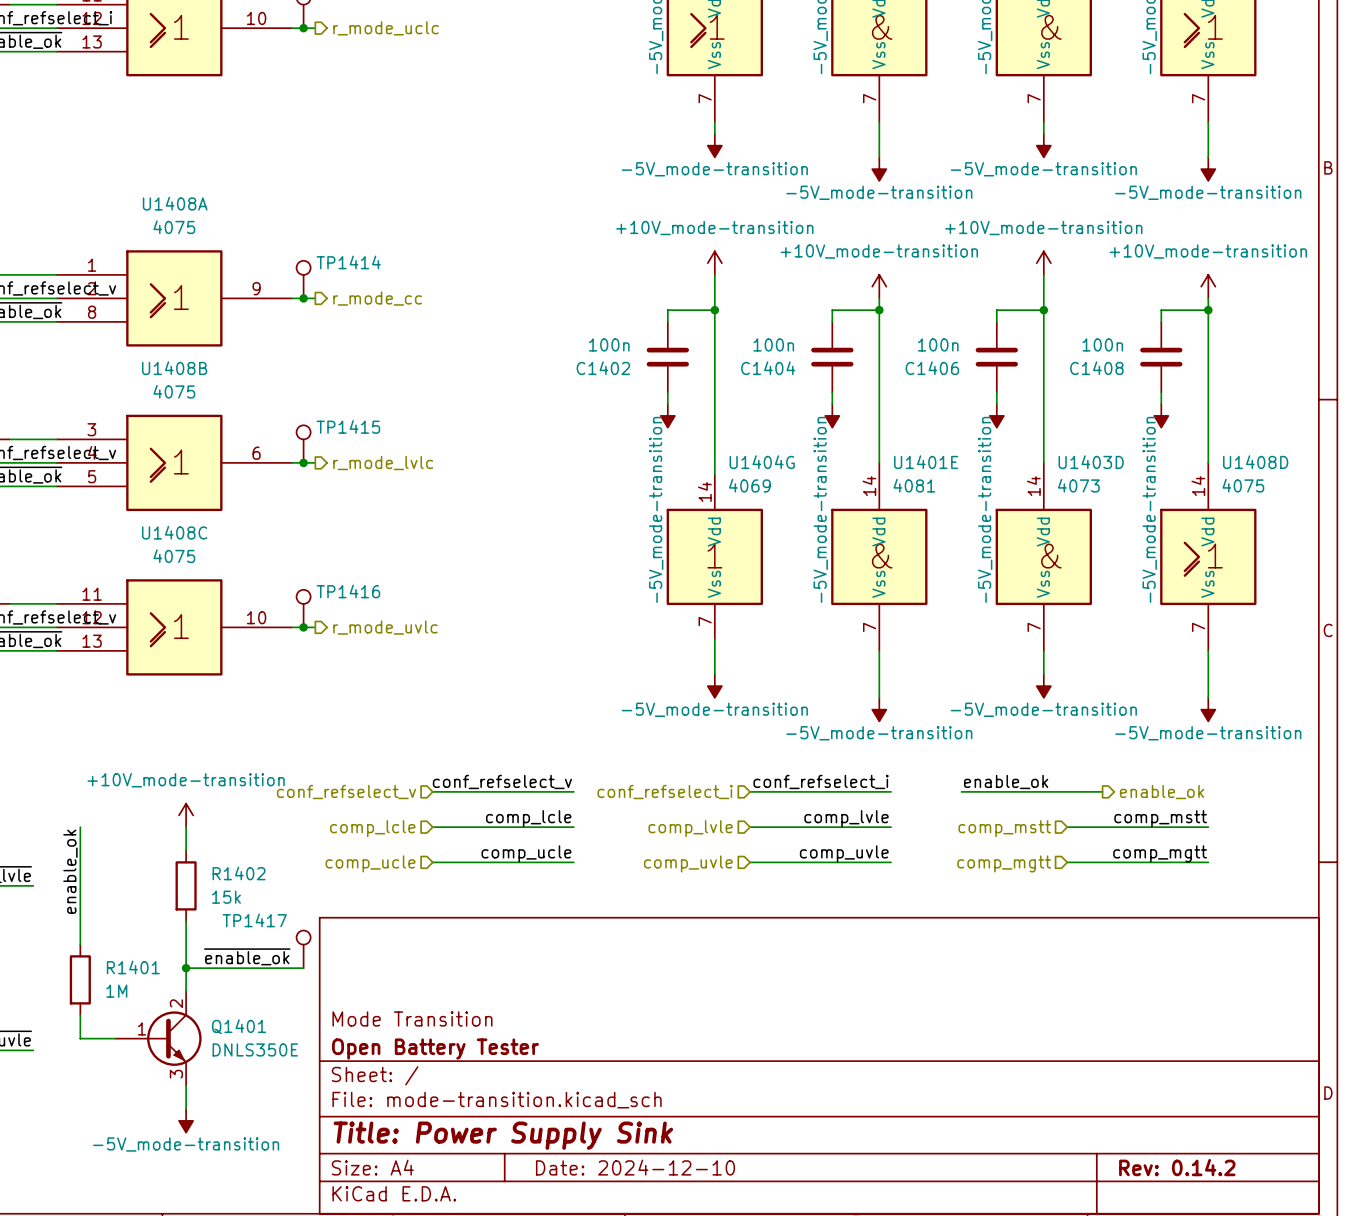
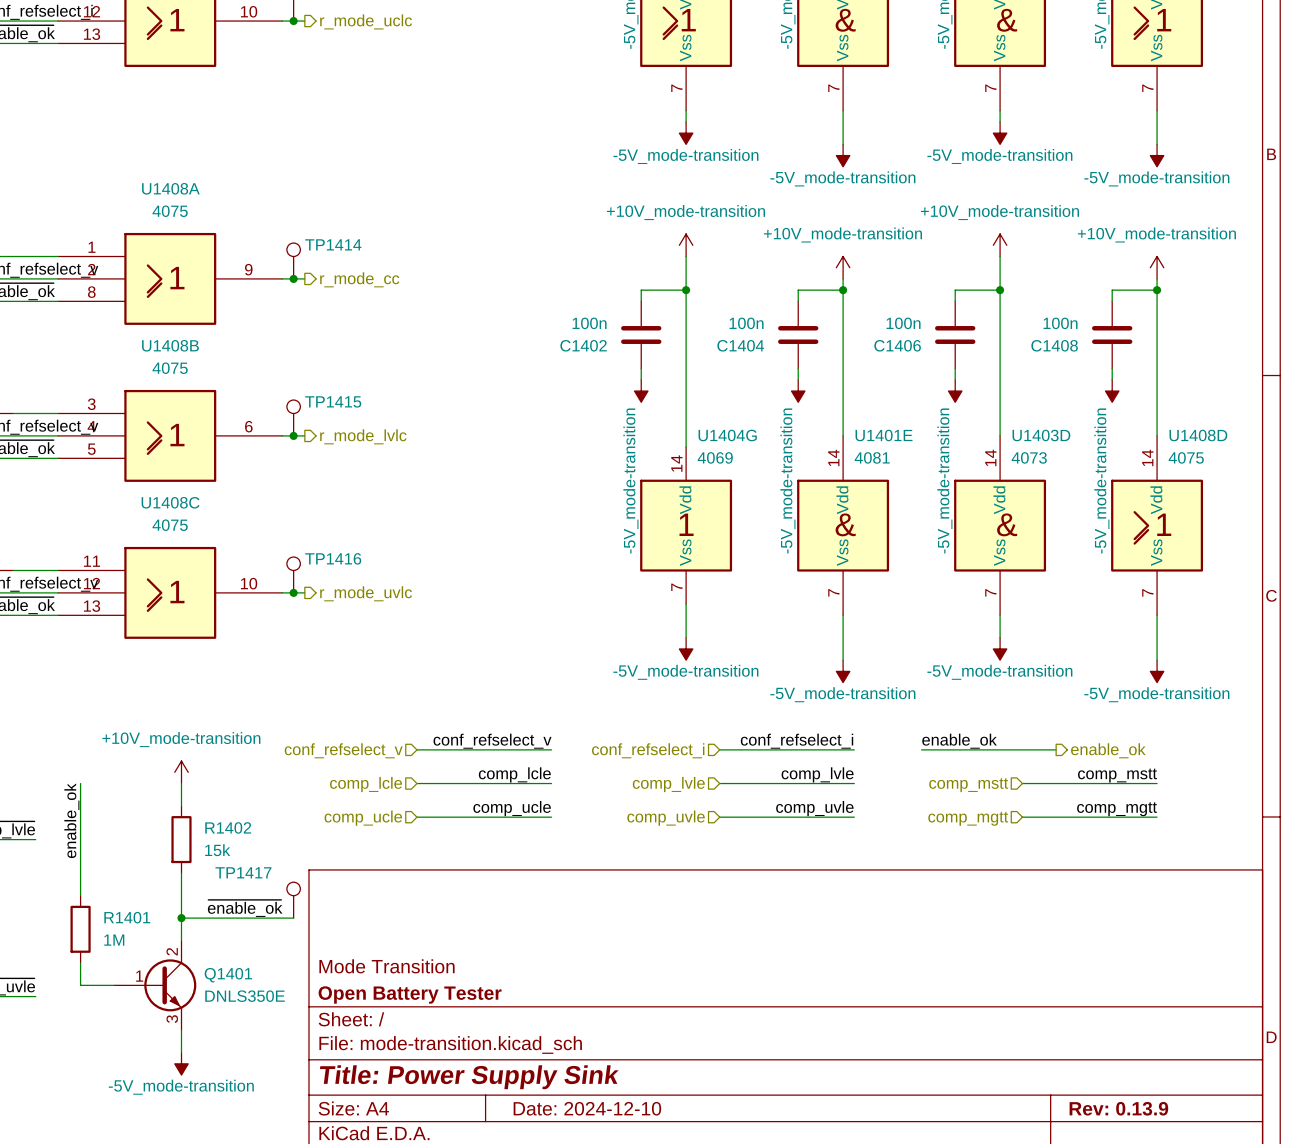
title block: Rev: 0.14.2 (1177, 1167) -> Rev: 0.13.9 (1118, 1108)

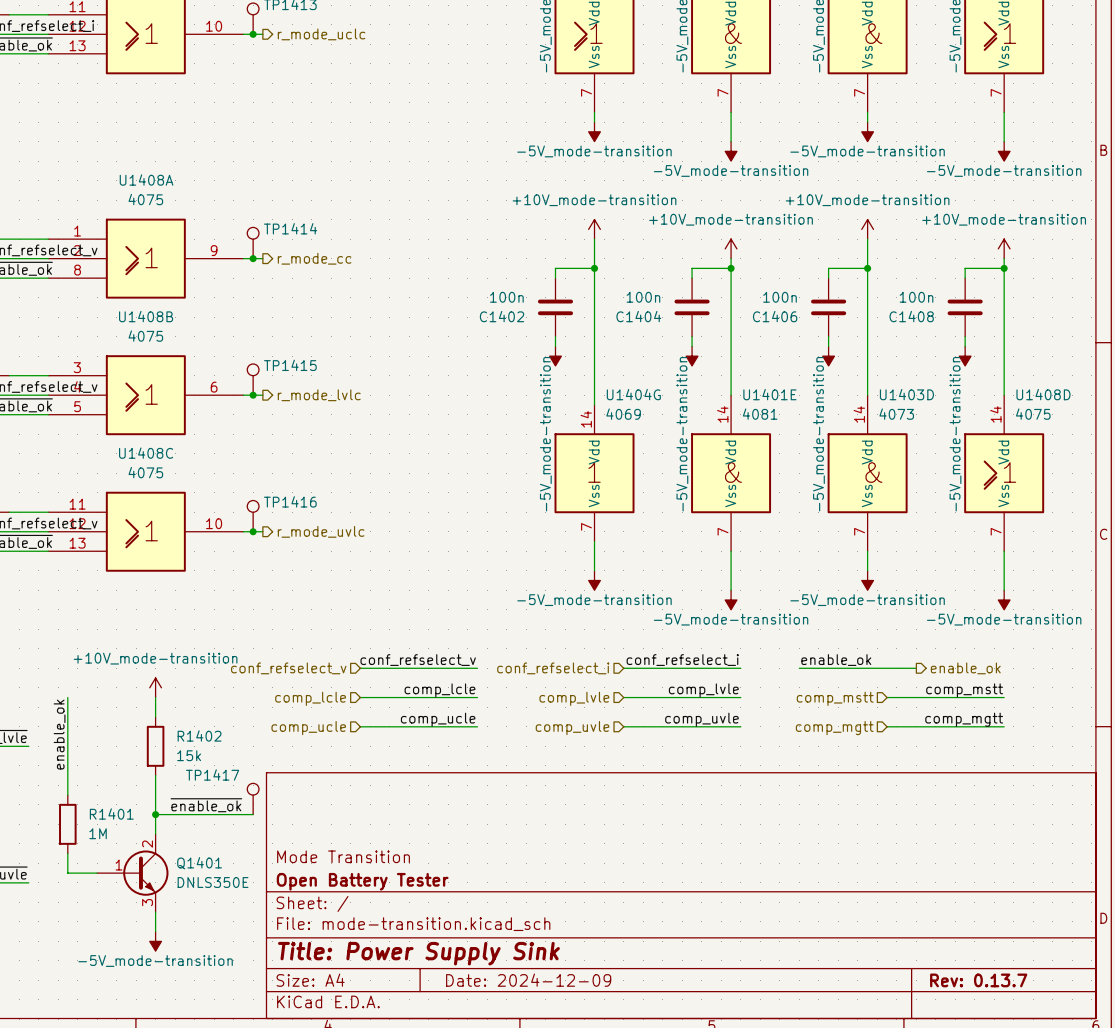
title block: Date: 2024-12-10 (587, 1108) -> Date: 2024-12-09 (528, 980)
title block: Rev: 0.13.9 (1118, 1108) -> Rev: 0.13.7 (978, 980)

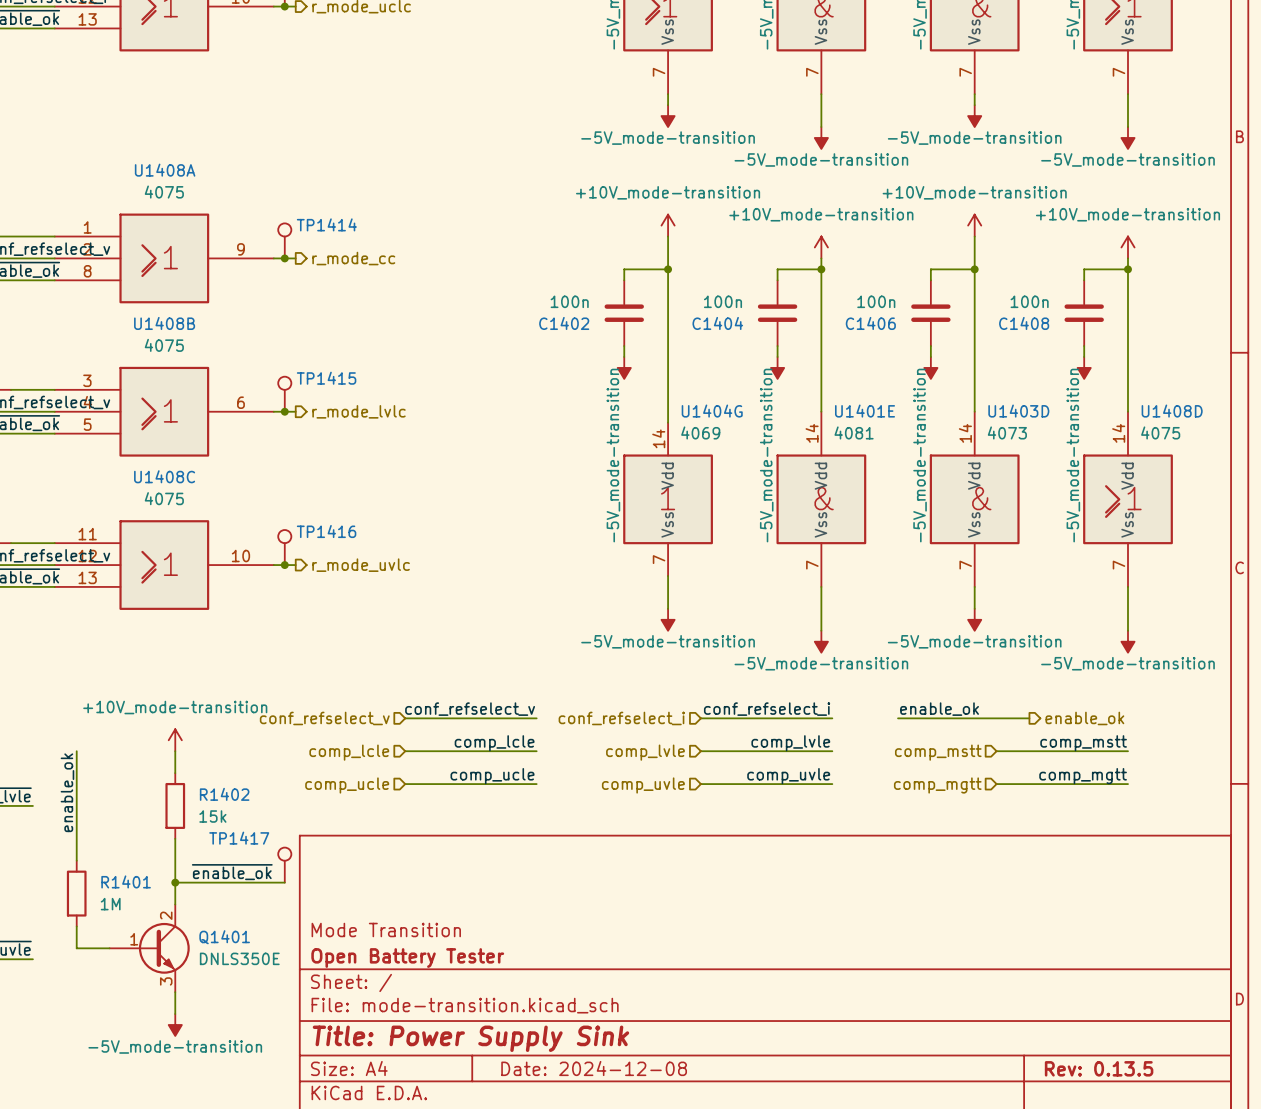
title block: Date: 2024-12-09 (528, 980) -> Date: 2024-12-08 (594, 1068)
title block: Rev: 0.13.7 (978, 980) -> Rev: 0.13.5 (1099, 1068)

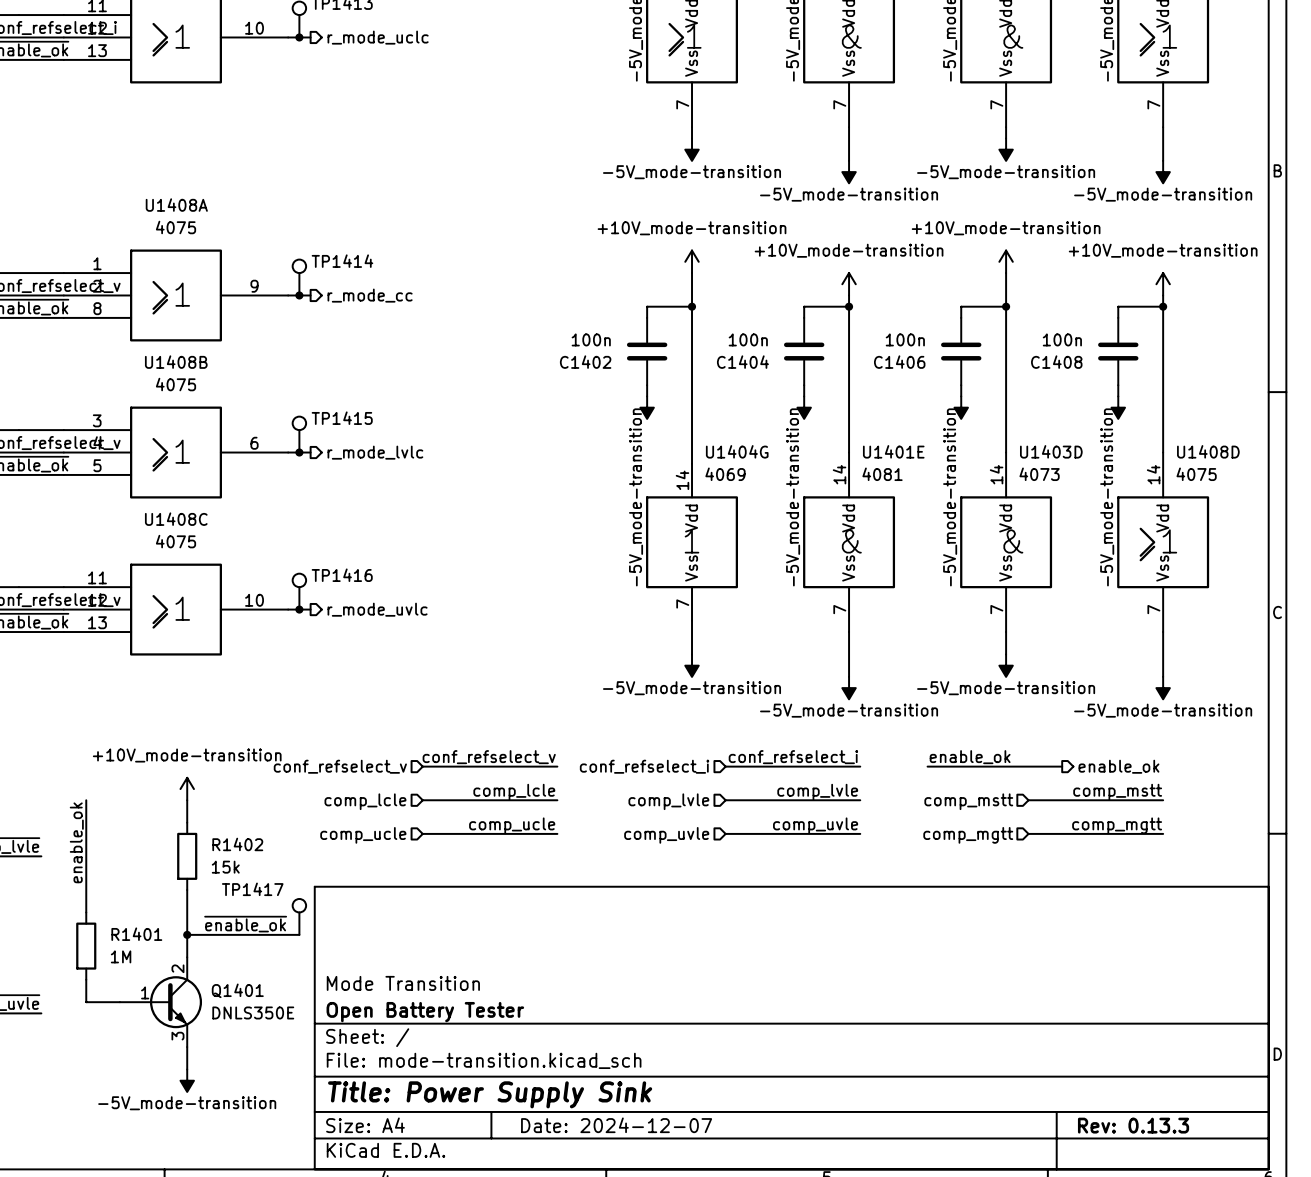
title block: Date: 2024-12-08 (594, 1068) -> Date: 2024-12-07 (616, 1125)
title block: Rev: 0.13.5 (1099, 1068) -> Rev: 0.13.3 (1133, 1125)

